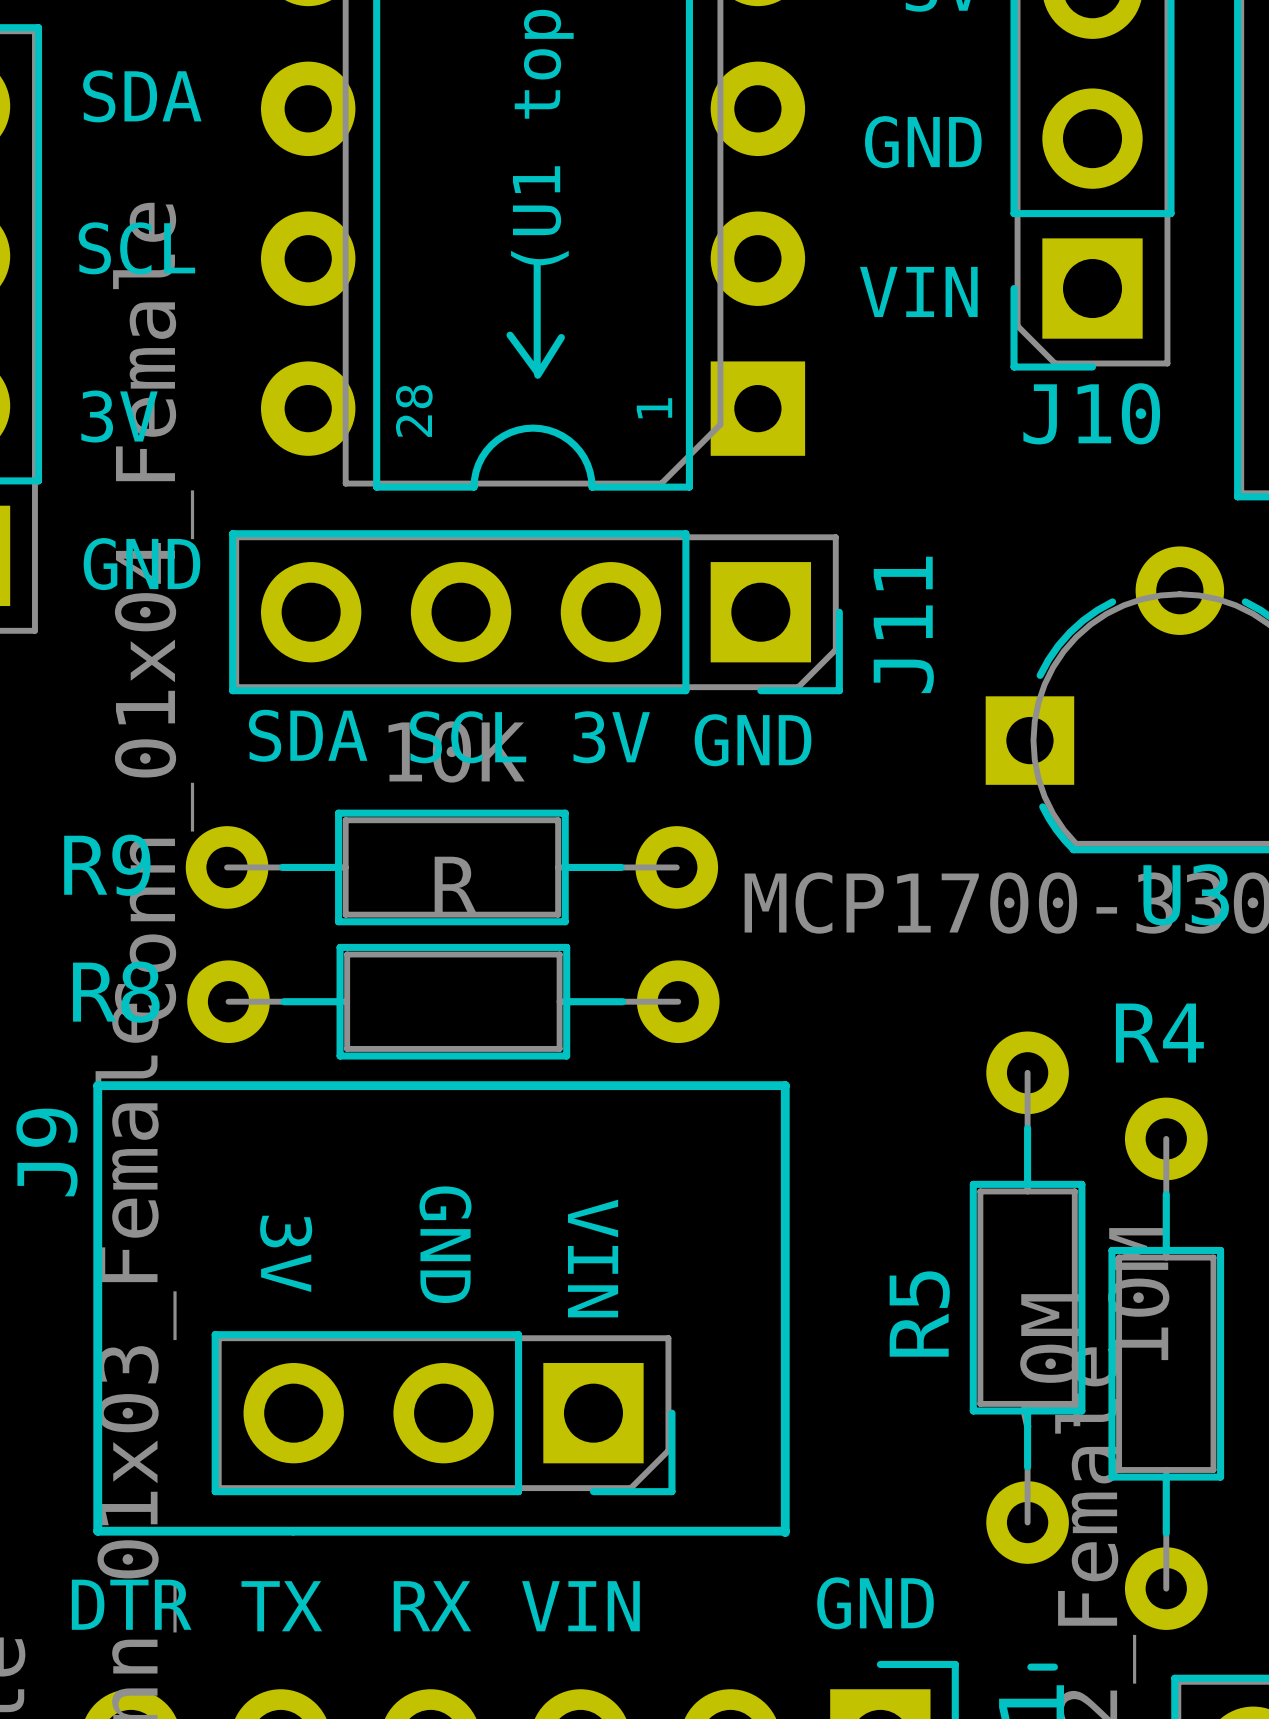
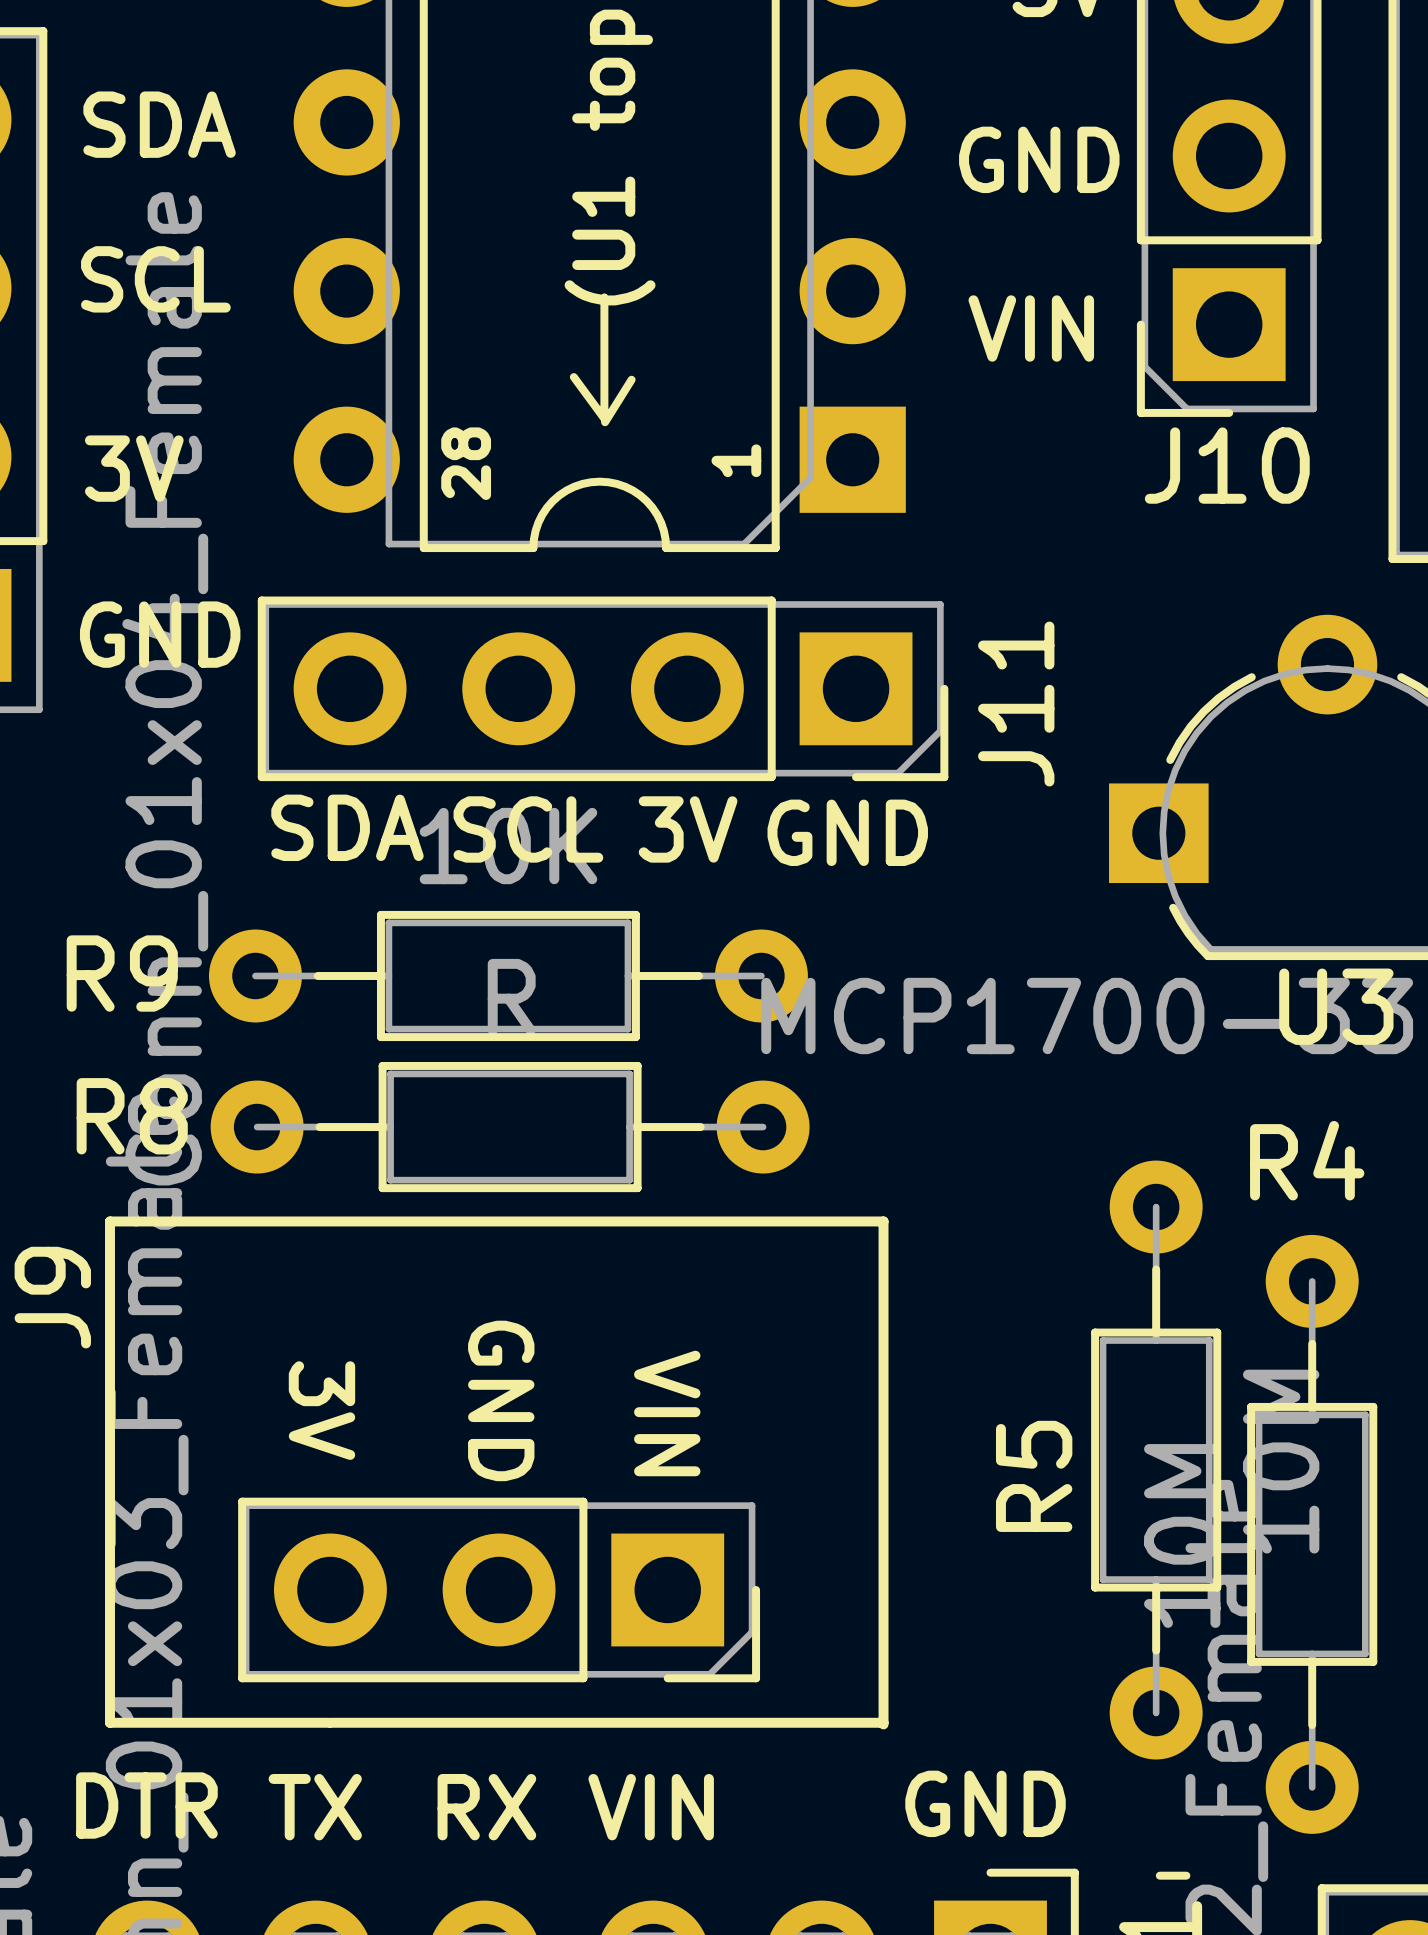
text position: SDA (142, 96) -> SDA (159, 124)

